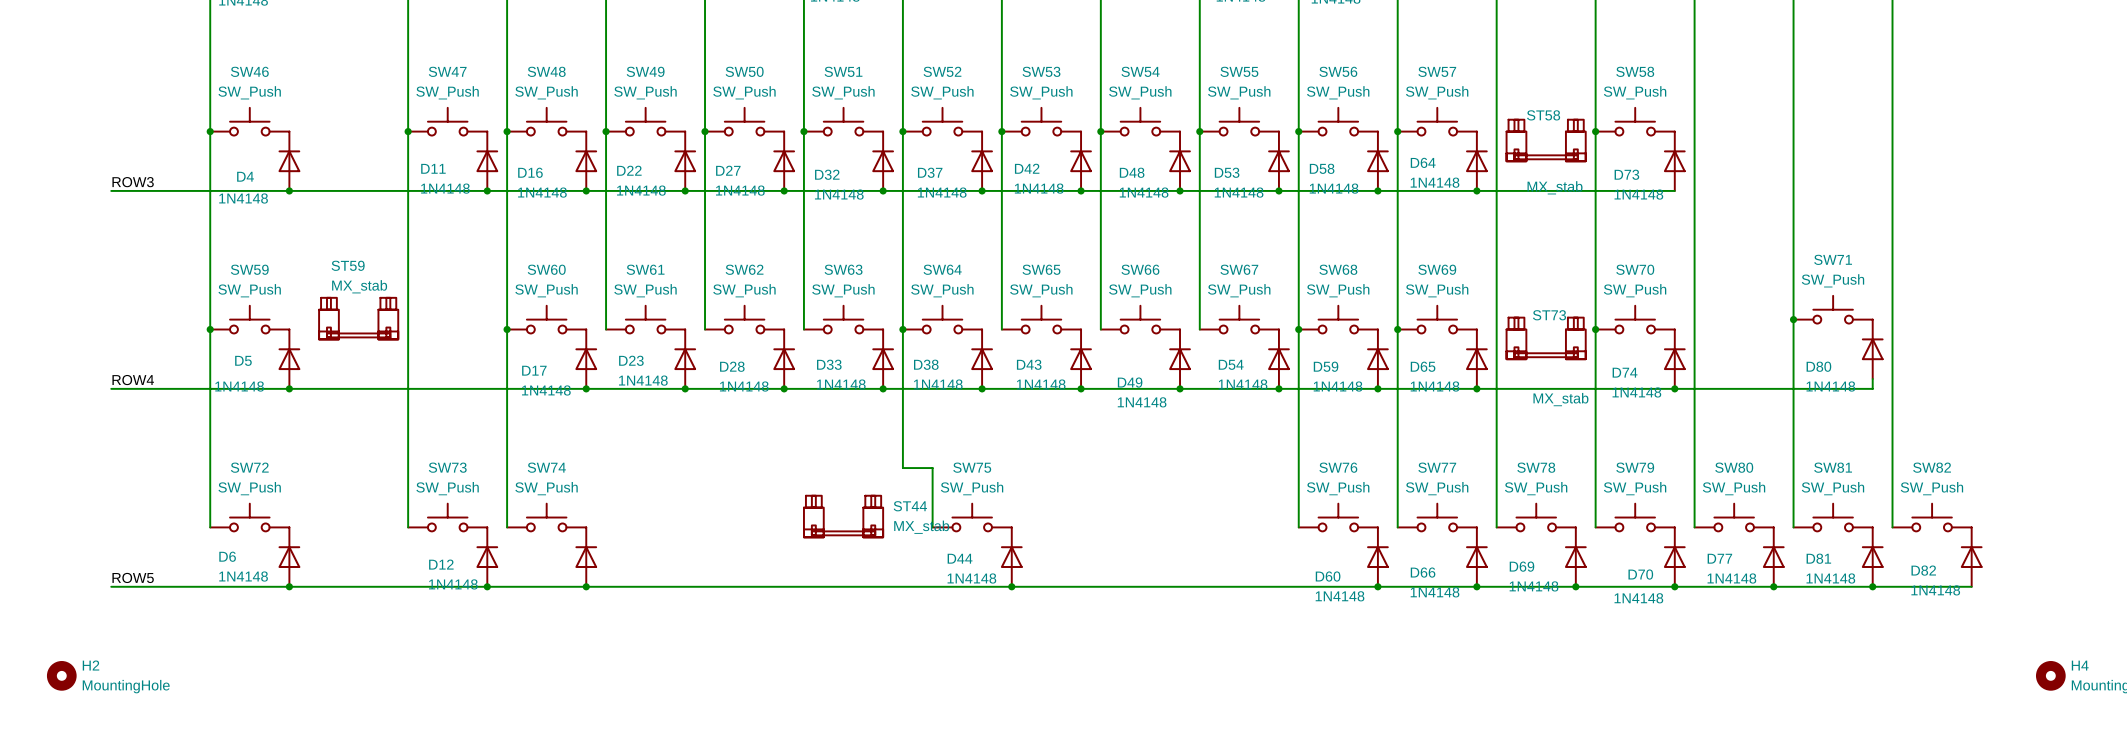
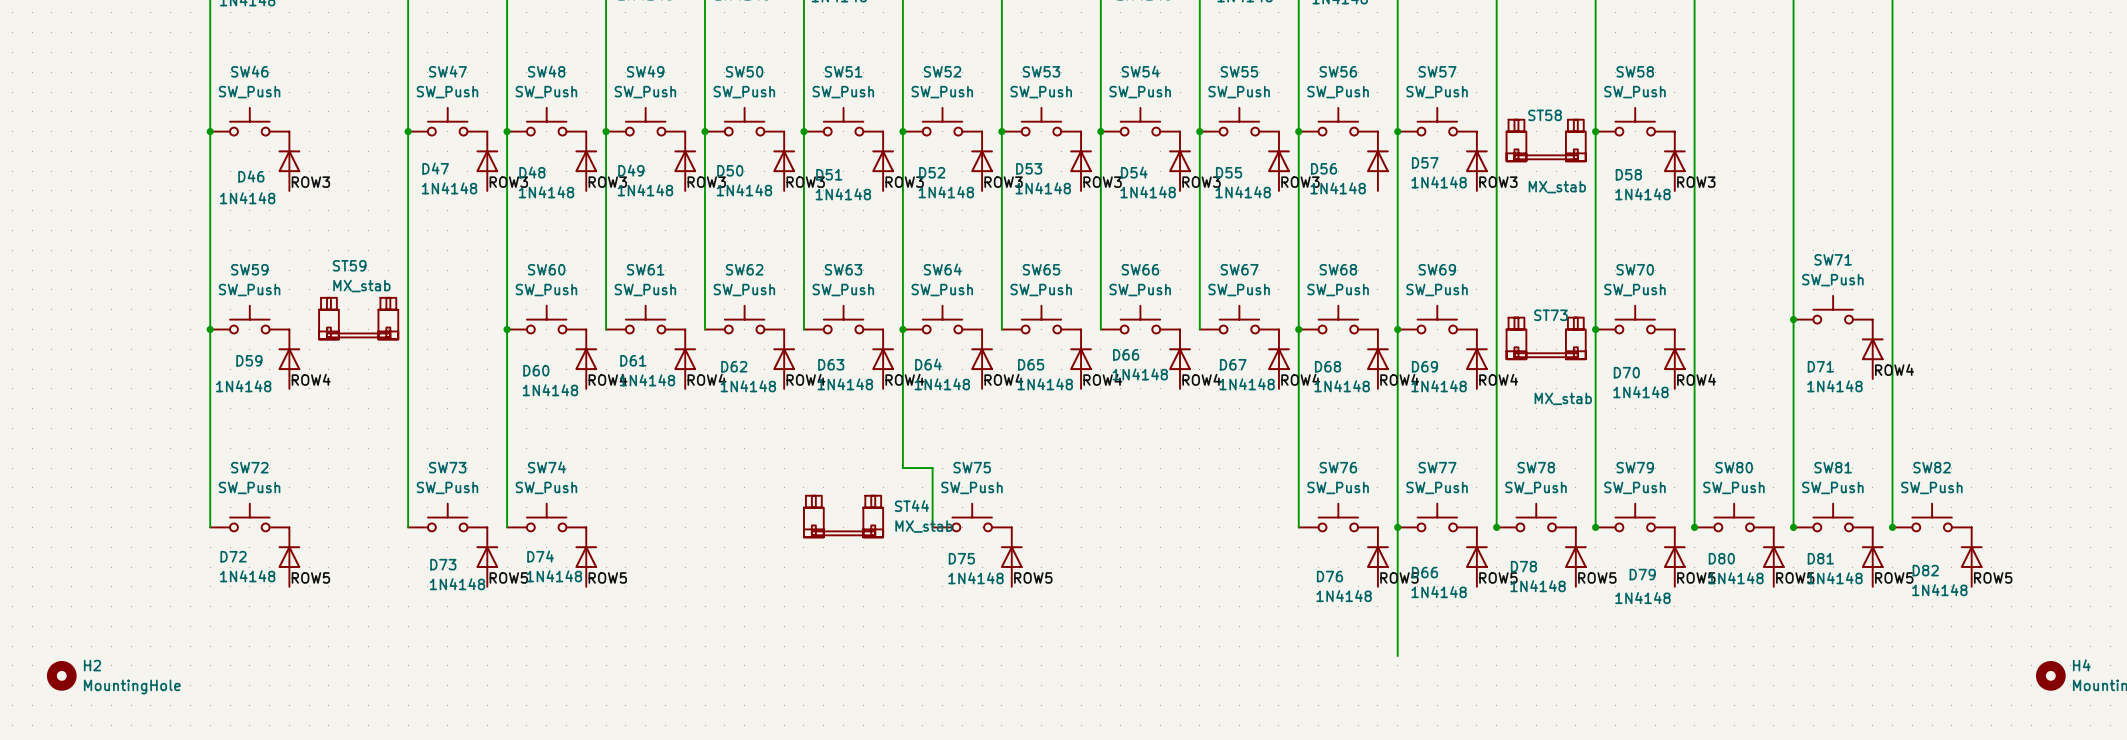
D64 name: D64 (1423, 162) -> D57 (1425, 162)
D11 name: D11 (433, 168) -> D47 (435, 168)
D42 name: D42 (1027, 168) -> D53 (1029, 168)
D58 name: D58 (1322, 168) -> D56 (1324, 168)
D22 name: D22 (629, 170) -> D49 (631, 170)
D27 name: D27 (728, 170) -> D50 (730, 170)
D16 name: D16 (530, 172) -> D48 (532, 172)
D37 name: D37 (930, 172) -> D52 (932, 172)
D48 name: D48 (1132, 172) -> D54 (1134, 172)
D53 name: D53 (1227, 172) -> D55 (1229, 172)
D32 name: D32 (827, 174) -> D51 (829, 174)
D73 name: D73 (1626, 174) -> D58 (1628, 174)
D4 name: D4 (245, 176) -> D46 (251, 176)
label position: ROW3 (133, 182) -> ROW3 (310, 182)
label: none -> ROW3 (508, 182)
label: none -> ROW3 (607, 182)
label: none -> ROW3 (706, 182)
label: none -> ROW3 (805, 182)
label: none -> ROW3 (904, 182)
label: none -> ROW3 (1003, 182)
label: none -> ROW3 (1102, 182)
label: none -> ROW3 (1201, 182)
label: none -> ROW3 (1300, 182)
label: none -> ROW3 (1498, 182)
label: none -> ROW3 (1696, 182)
wire: (111, 190) (1674, 190) -> none
junction: (289, 190) -> none
junction: (487, 190) -> none
junction: (586, 190) -> none
junction: (685, 190) -> none
junction: (784, 190) -> none
junction: (883, 190) -> none
junction: (982, 190) -> none
junction: (1081, 190) -> none
junction: (1180, 190) -> none
junction: (1278, 190) -> none
junction: (1377, 190) -> none
junction: (1476, 190) -> none
D5 name: D5 (243, 360) -> D59 (249, 360)
D23 name: D23 (631, 360) -> D61 (633, 360)
D33 name: D33 (829, 364) -> D63 (831, 364)
D38 name: D38 (926, 364) -> D64 (928, 364)
D43 name: D43 (1029, 364) -> D65 (1031, 364)
D54 name: D54 (1231, 364) -> D67 (1233, 364)
D28 name: D28 (732, 366) -> D62 (734, 366)
D59 name: D59 (1326, 366) -> D68 (1328, 366)
D65 name: D65 (1423, 366) -> D69 (1424, 366)
D80 name: D80 (1818, 366) -> D71 (1820, 366)
D17 name: D17 (534, 370) -> D60 (536, 370)
label: none -> ROW4 (1894, 369)
D74 name: D74 (1625, 372) -> D70 (1626, 372)
wire: (1872, 378) (1872, 388) (111, 388) -> none
label position: ROW4 (133, 380) -> ROW4 (311, 379)
label: none -> ROW4 (608, 379)
label: none -> ROW4 (706, 379)
label: none -> ROW4 (805, 379)
label: none -> ROW4 (904, 379)
label: none -> ROW4 (1003, 379)
label: none -> ROW4 (1102, 379)
label: none -> ROW4 (1201, 379)
label: none -> ROW4 (1300, 379)
label: none -> ROW4 (1399, 379)
label: none -> ROW4 (1498, 379)
label: none -> ROW4 (1696, 379)
D49 name: D49 (1130, 382) -> D66 (1126, 354)
junction: (289, 388) -> none
junction: (586, 388) -> none
junction: (685, 388) -> none
junction: (784, 388) -> none
junction: (883, 388) -> none
junction: (982, 388) -> none
junction: (1081, 388) -> none
junction: (1180, 388) -> none
junction: (1278, 388) -> none
junction: (1377, 388) -> none
junction: (1476, 388) -> none
junction: (1674, 388) -> none
D49 value position: 1N4148 (1142, 402) -> 1N4148 (1140, 374)
wire: none -> (1397, 527) (1397, 656)
junction: none -> (1397, 527)
junction: none -> (1496, 527)
junction: none -> (1595, 527)
junction: none -> (1694, 527)
junction: none -> (1793, 527)
junction: none -> (1892, 527)
D6 name: D6 (227, 556) -> D72 (233, 556)
D74 name: none -> D74 (540, 556)
D44 name: D44 (960, 558) -> D75 (961, 558)
D77 name: D77 (1719, 558) -> D80 (1721, 558)
D12 name: D12 (441, 564) -> D73 (443, 564)
D69 name: D69 (1521, 566) -> D78 (1523, 566)
D70 name: D70 (1640, 574) -> D79 (1642, 574)
D74 value: none -> 1N4148 (554, 576)
D60 name: D60 (1328, 576) -> D76 (1329, 576)
label position: ROW5 (133, 577) -> ROW5 (310, 577)
label: none -> ROW5 (508, 577)
label: none -> ROW5 (607, 577)
label: none -> ROW5 (1033, 577)
label: none -> ROW5 (1399, 577)
label: none -> ROW5 (1498, 577)
label: none -> ROW5 (1597, 577)
label: none -> ROW5 (1696, 577)
label: none -> ROW5 (1795, 577)
label: none -> ROW5 (1894, 577)
label: none -> ROW5 (1993, 577)
wire: (111, 586) (1971, 586) -> none
junction: (289, 586) -> none
junction: (487, 586) -> none
junction: (586, 586) -> none
junction: (1011, 586) -> none
junction: (1377, 586) -> none
junction: (1476, 586) -> none
junction: (1575, 586) -> none
junction: (1674, 586) -> none
junction: (1773, 586) -> none
junction: (1872, 586) -> none

